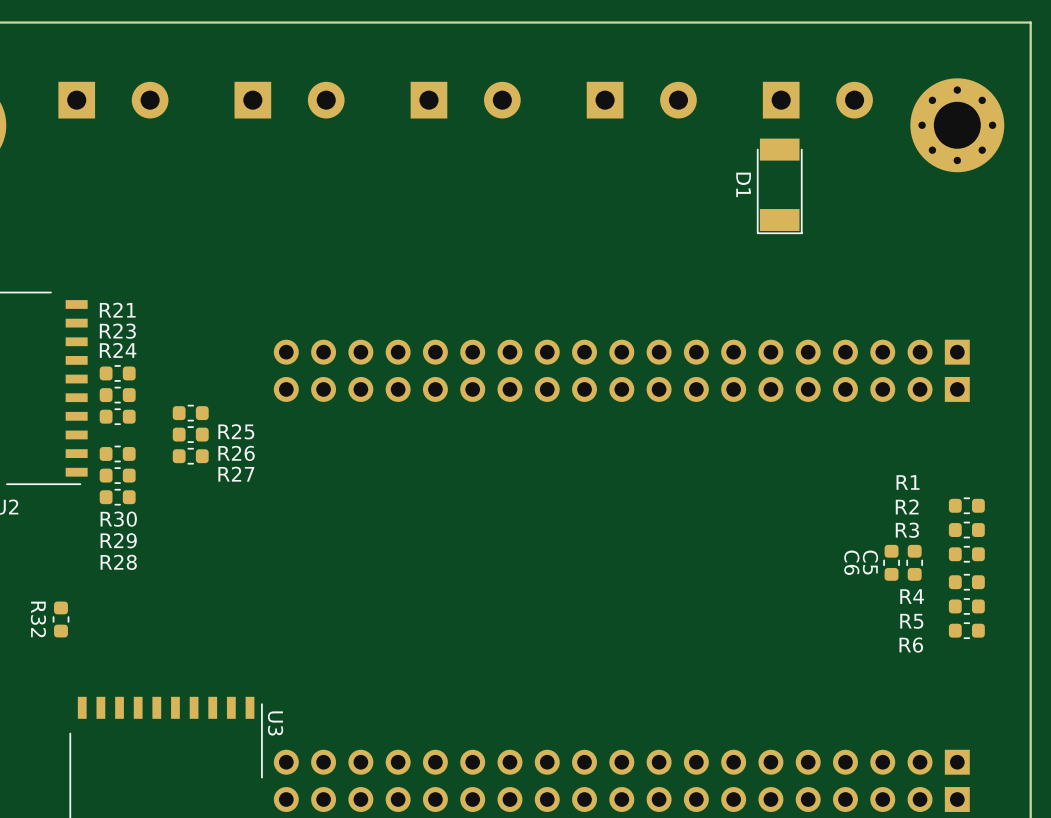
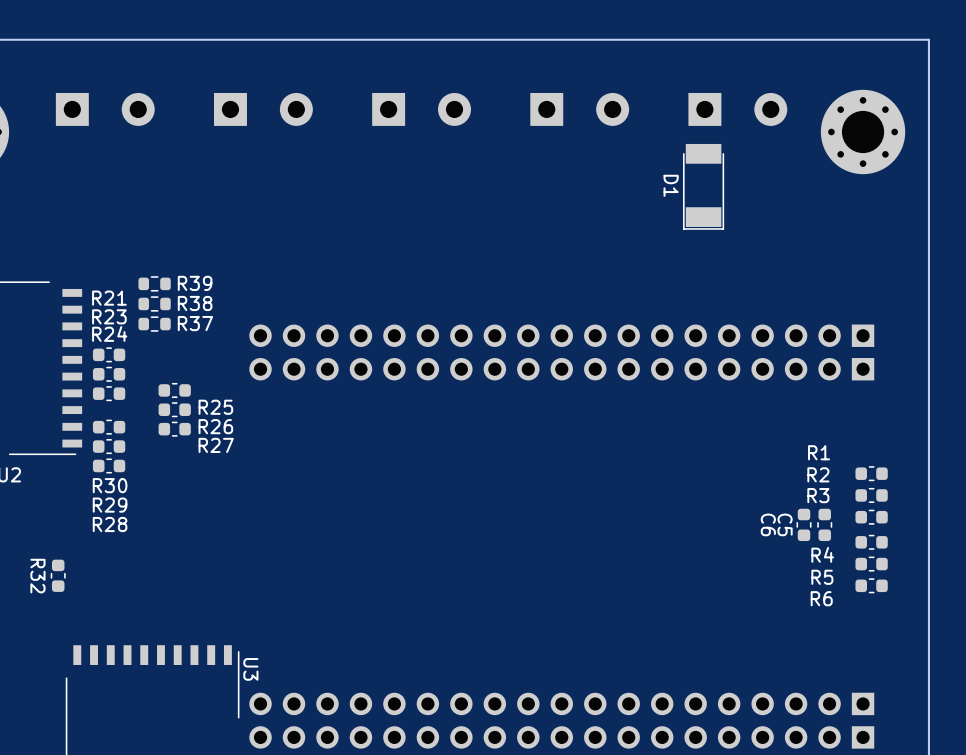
R39: none -> (154, 283)
R38: none -> (154, 303)
R37: none -> (154, 324)

